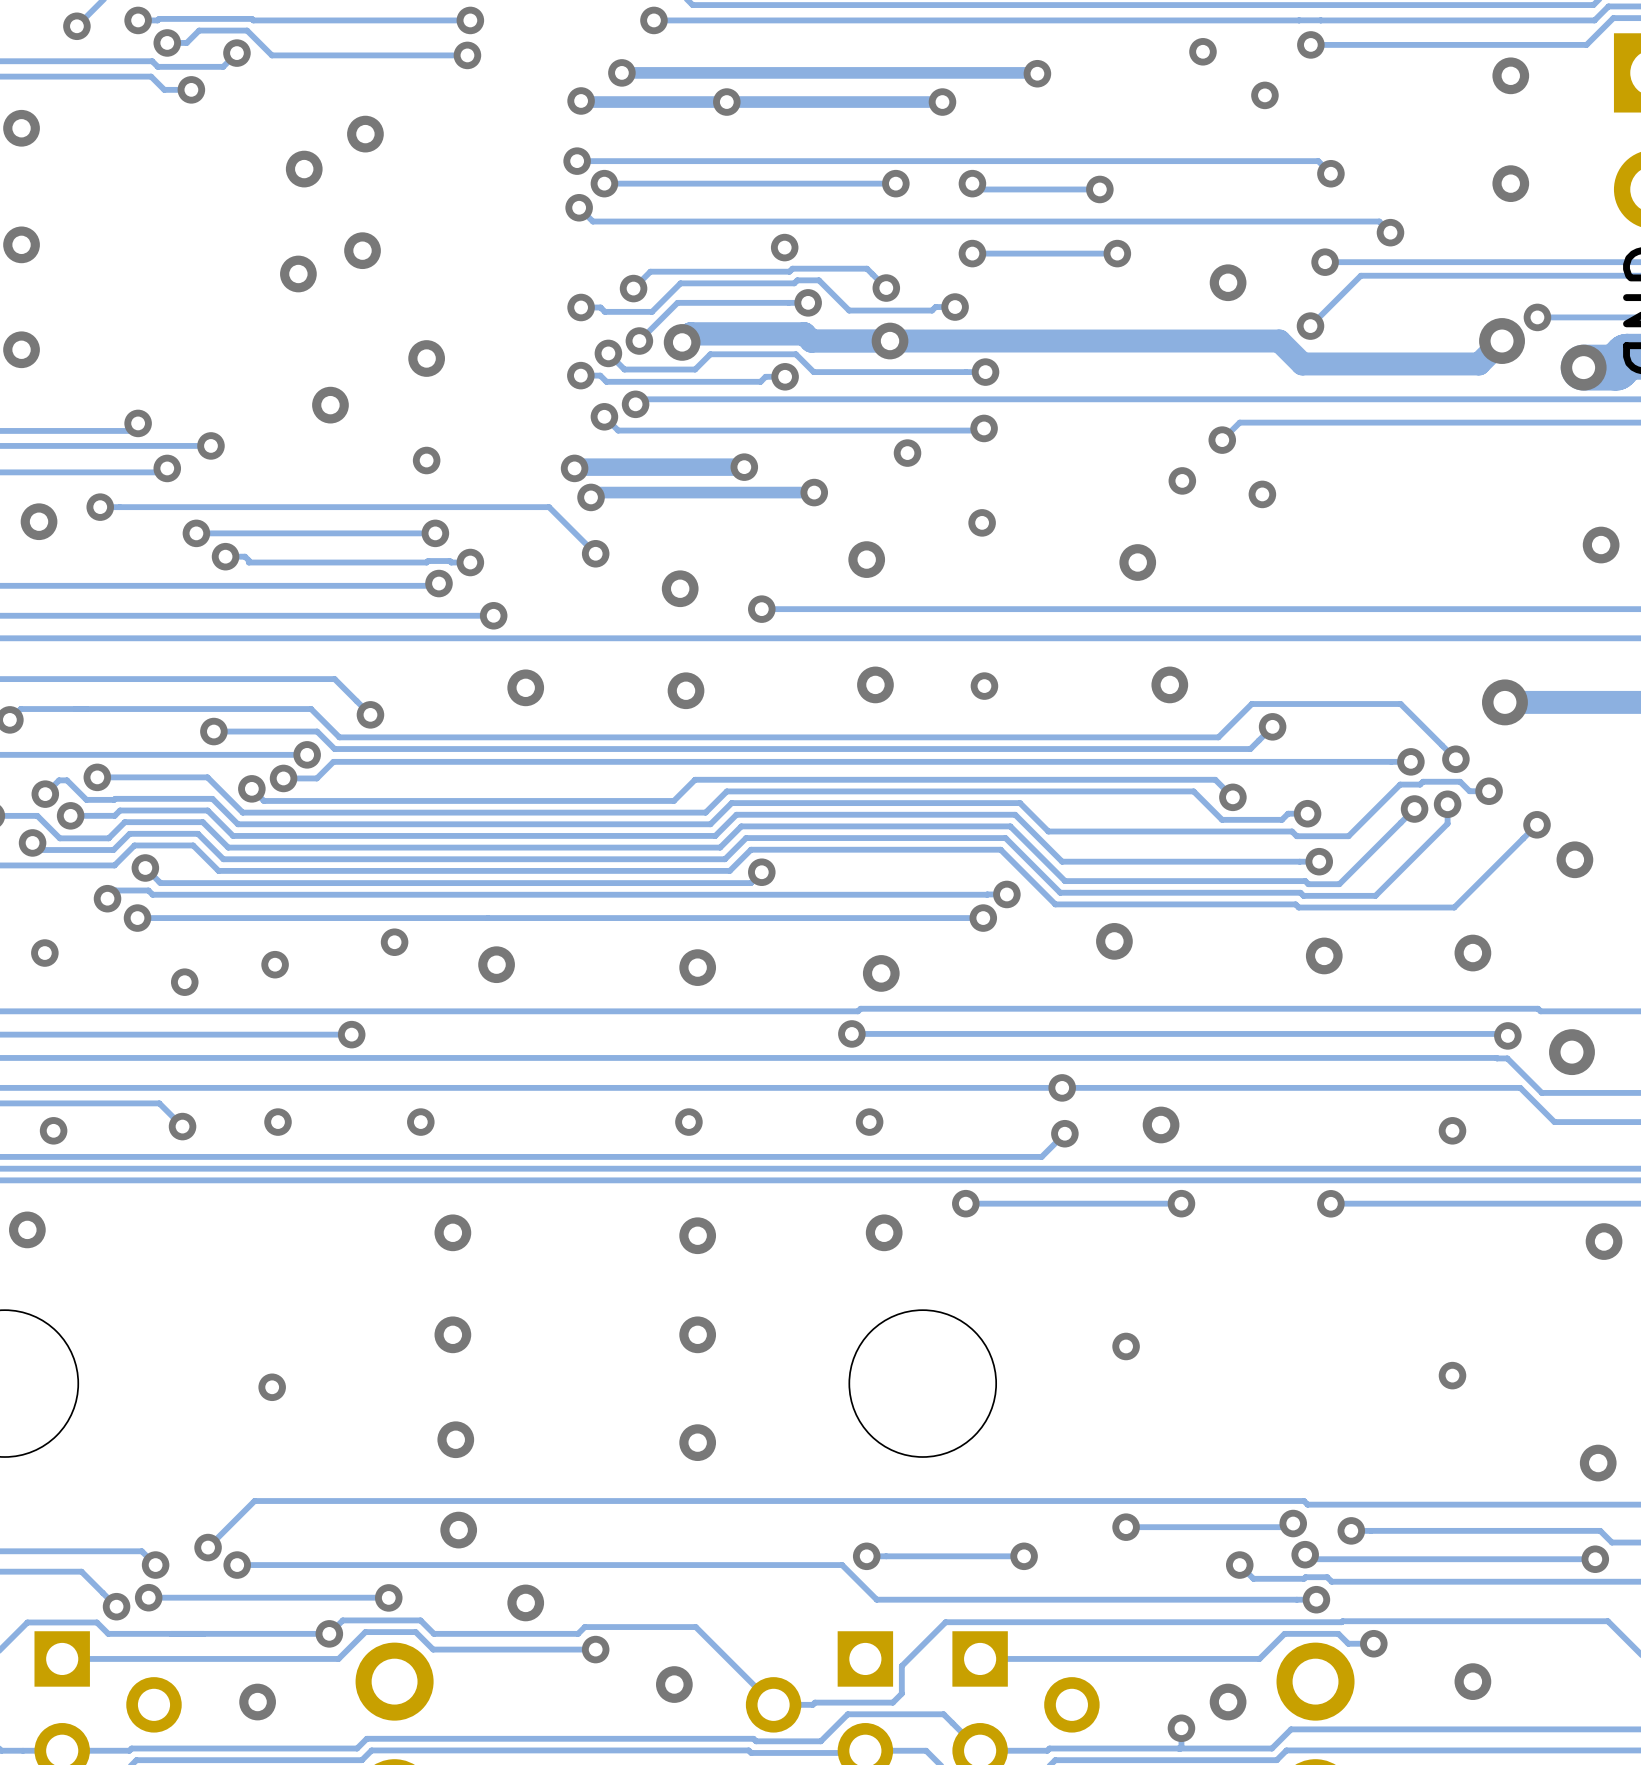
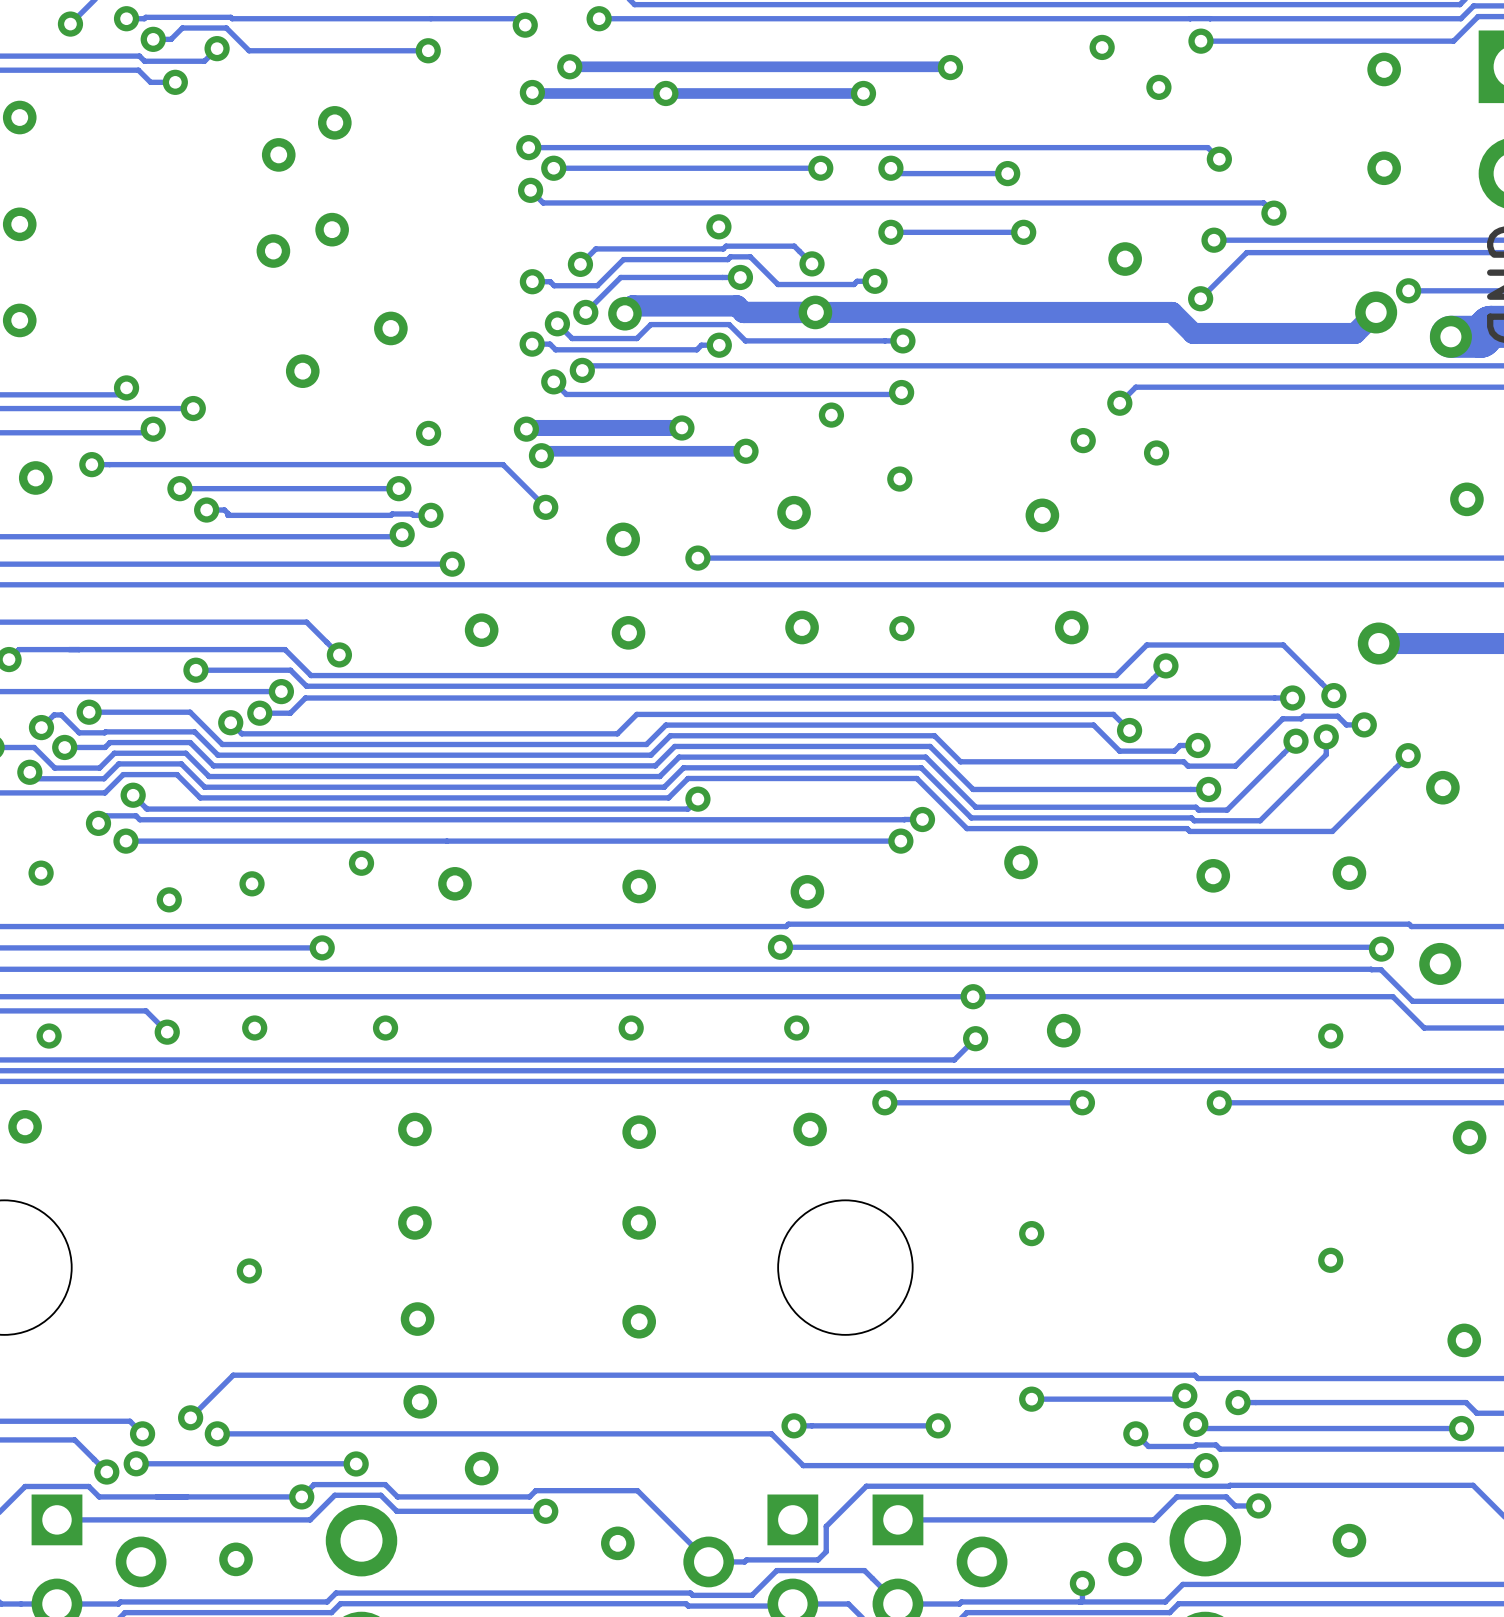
track: none -> (430, 18) (518, 18) (525, 25)
via position: (470, 20) -> (525, 25)
via position: (426, 460) -> (428, 433)

